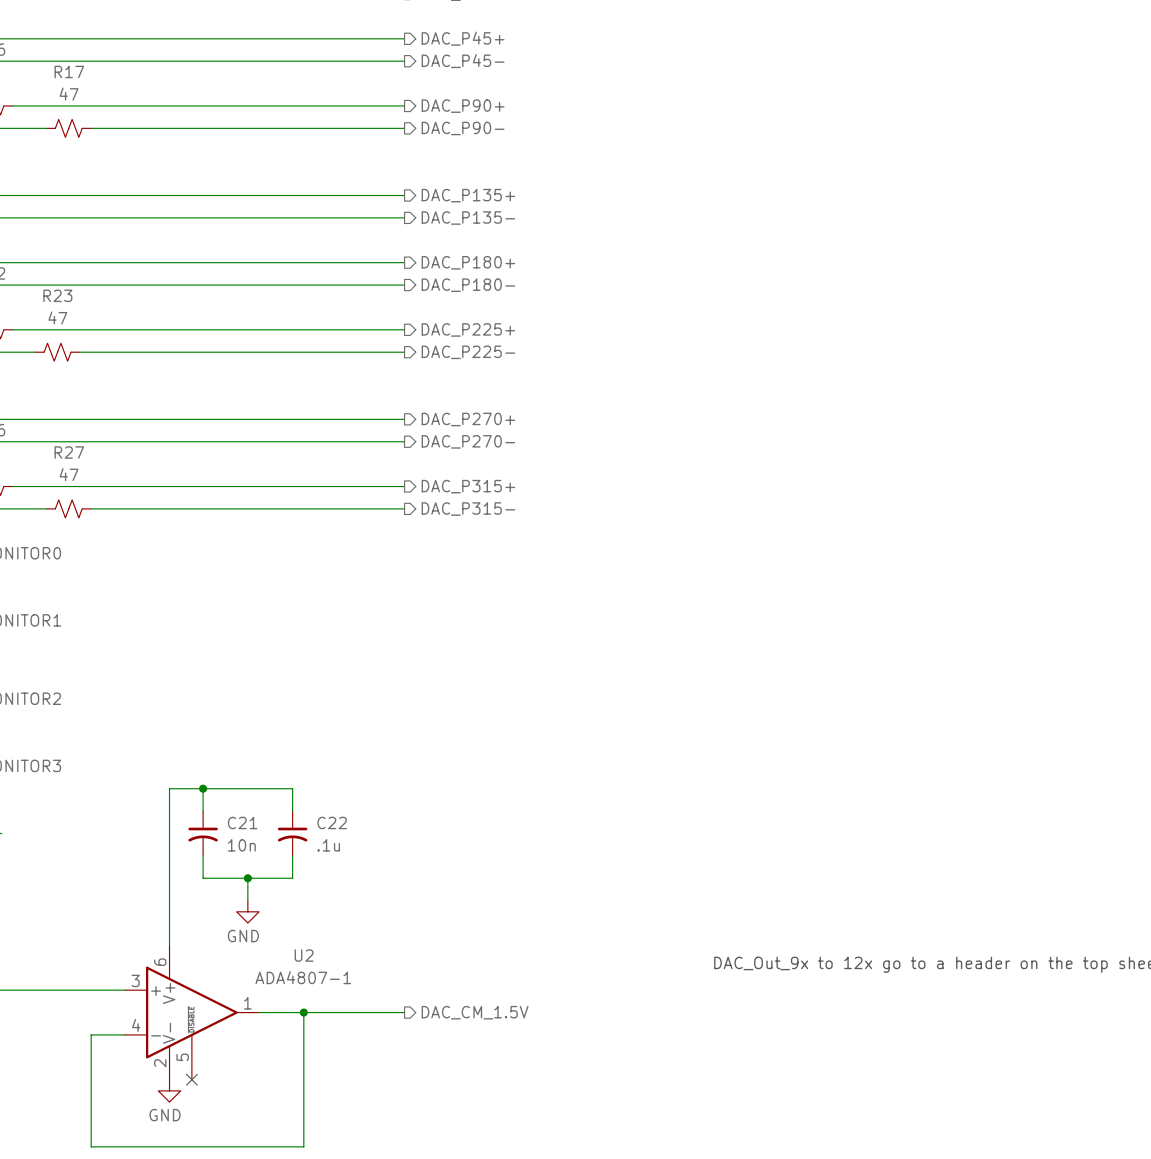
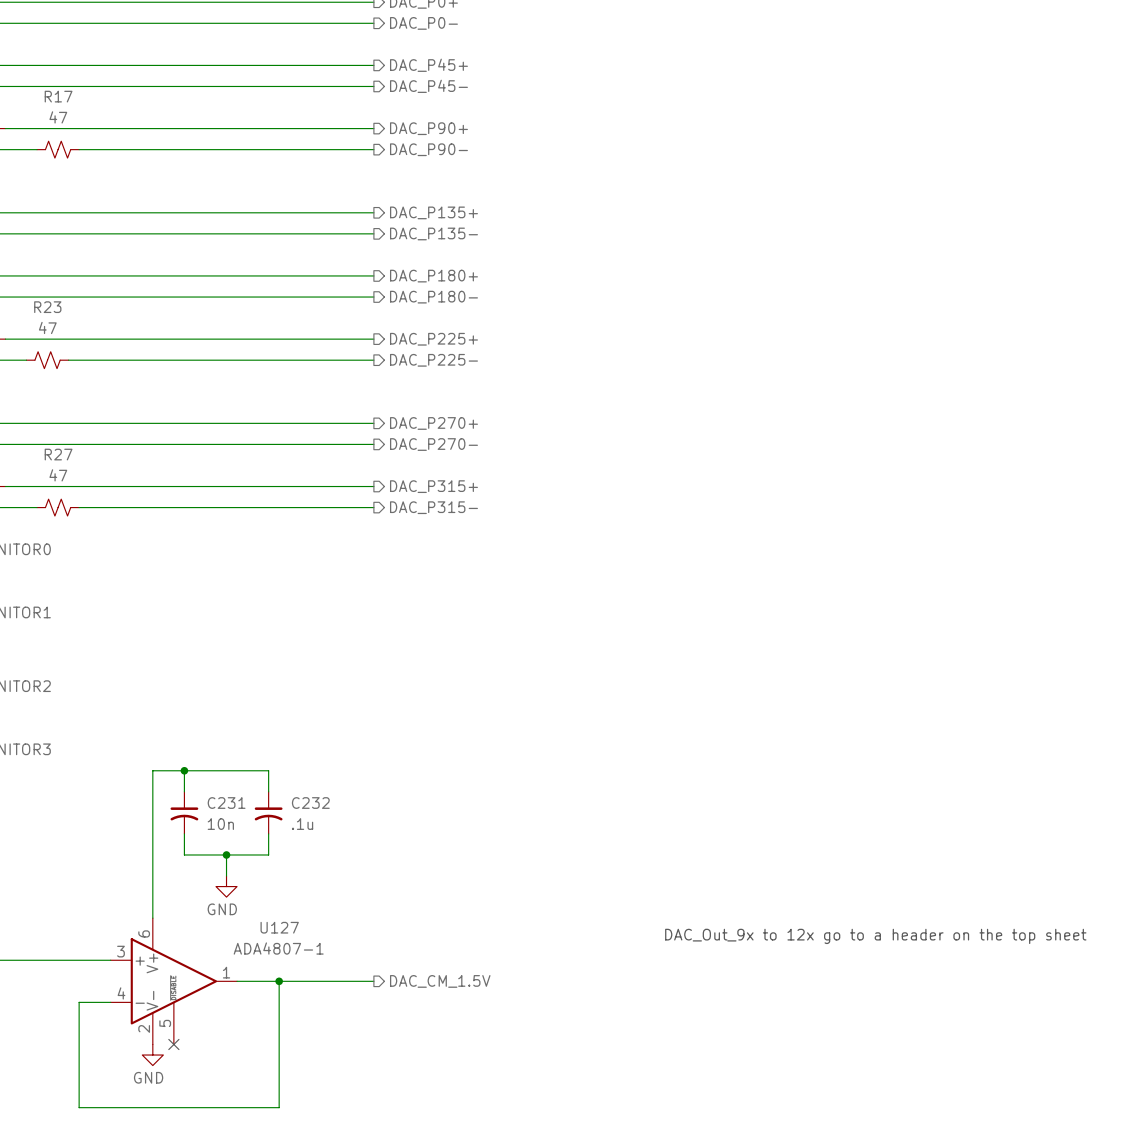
C21 name: C21 (242, 822) -> C231 (226, 803)
C22 name: C22 (332, 822) -> C232 (310, 803)
U2 name: U2 (304, 955) -> U127 (279, 927)

